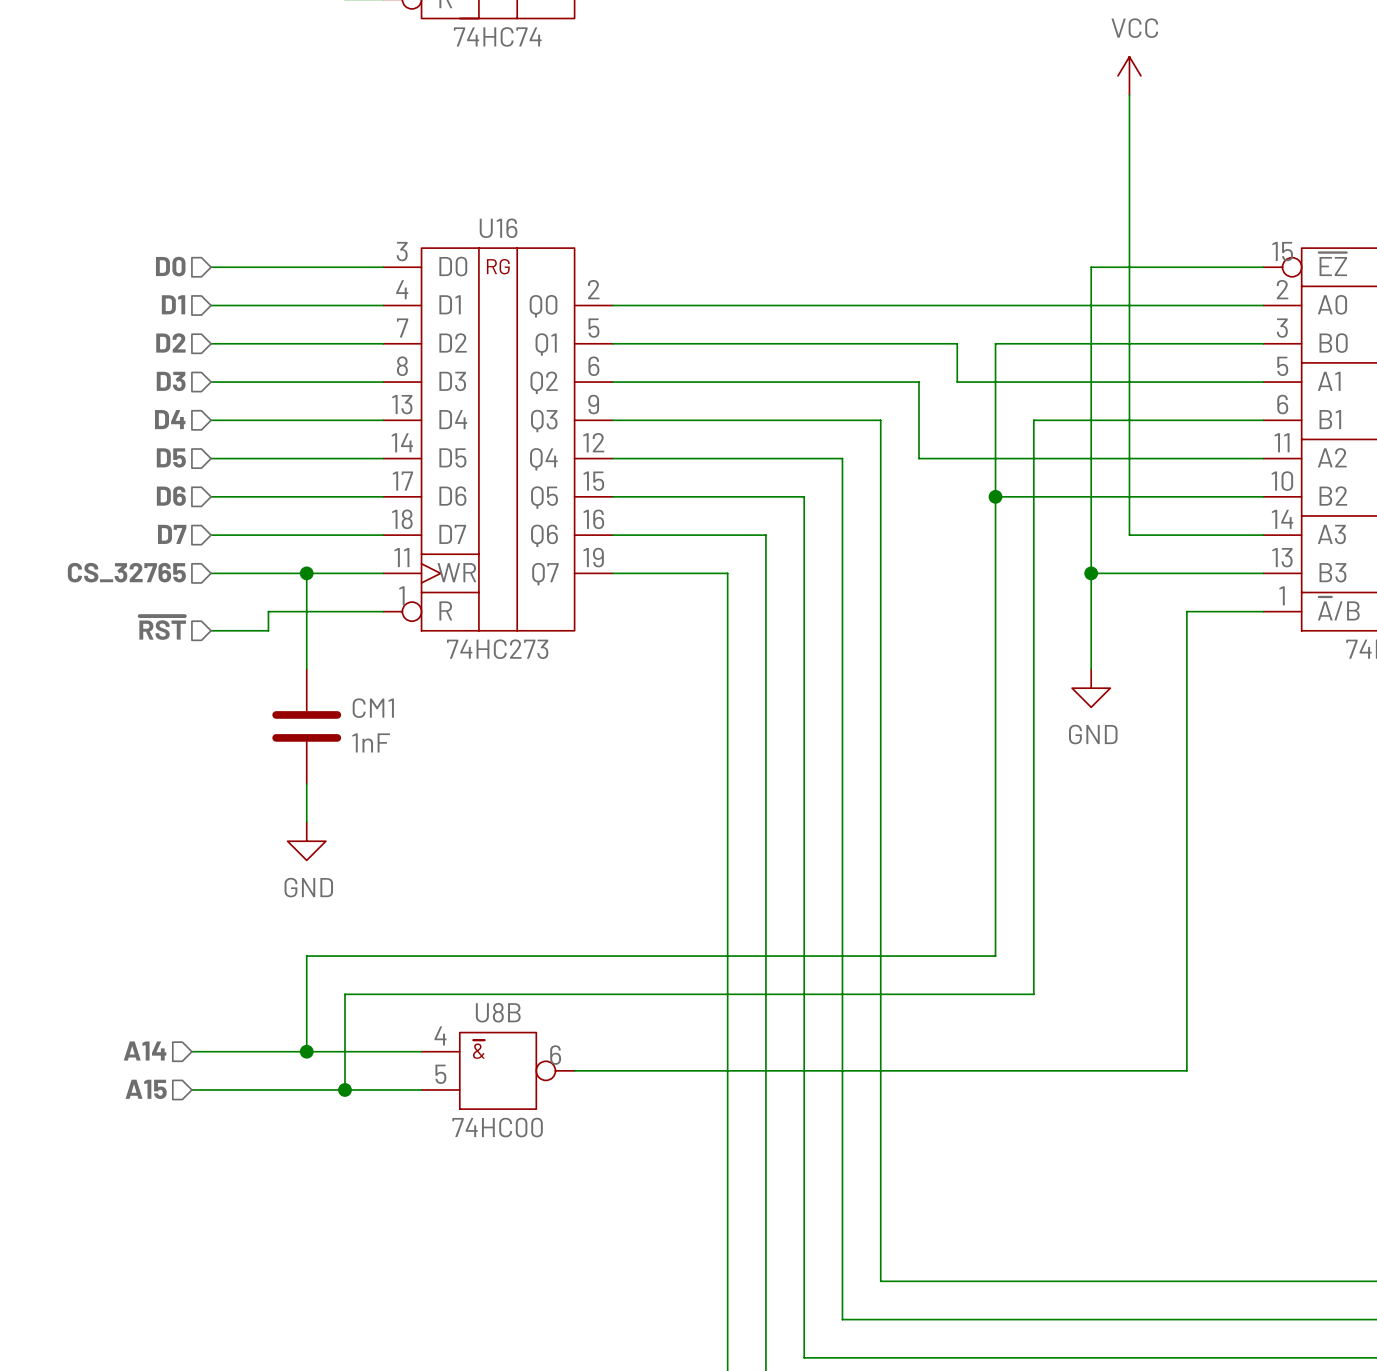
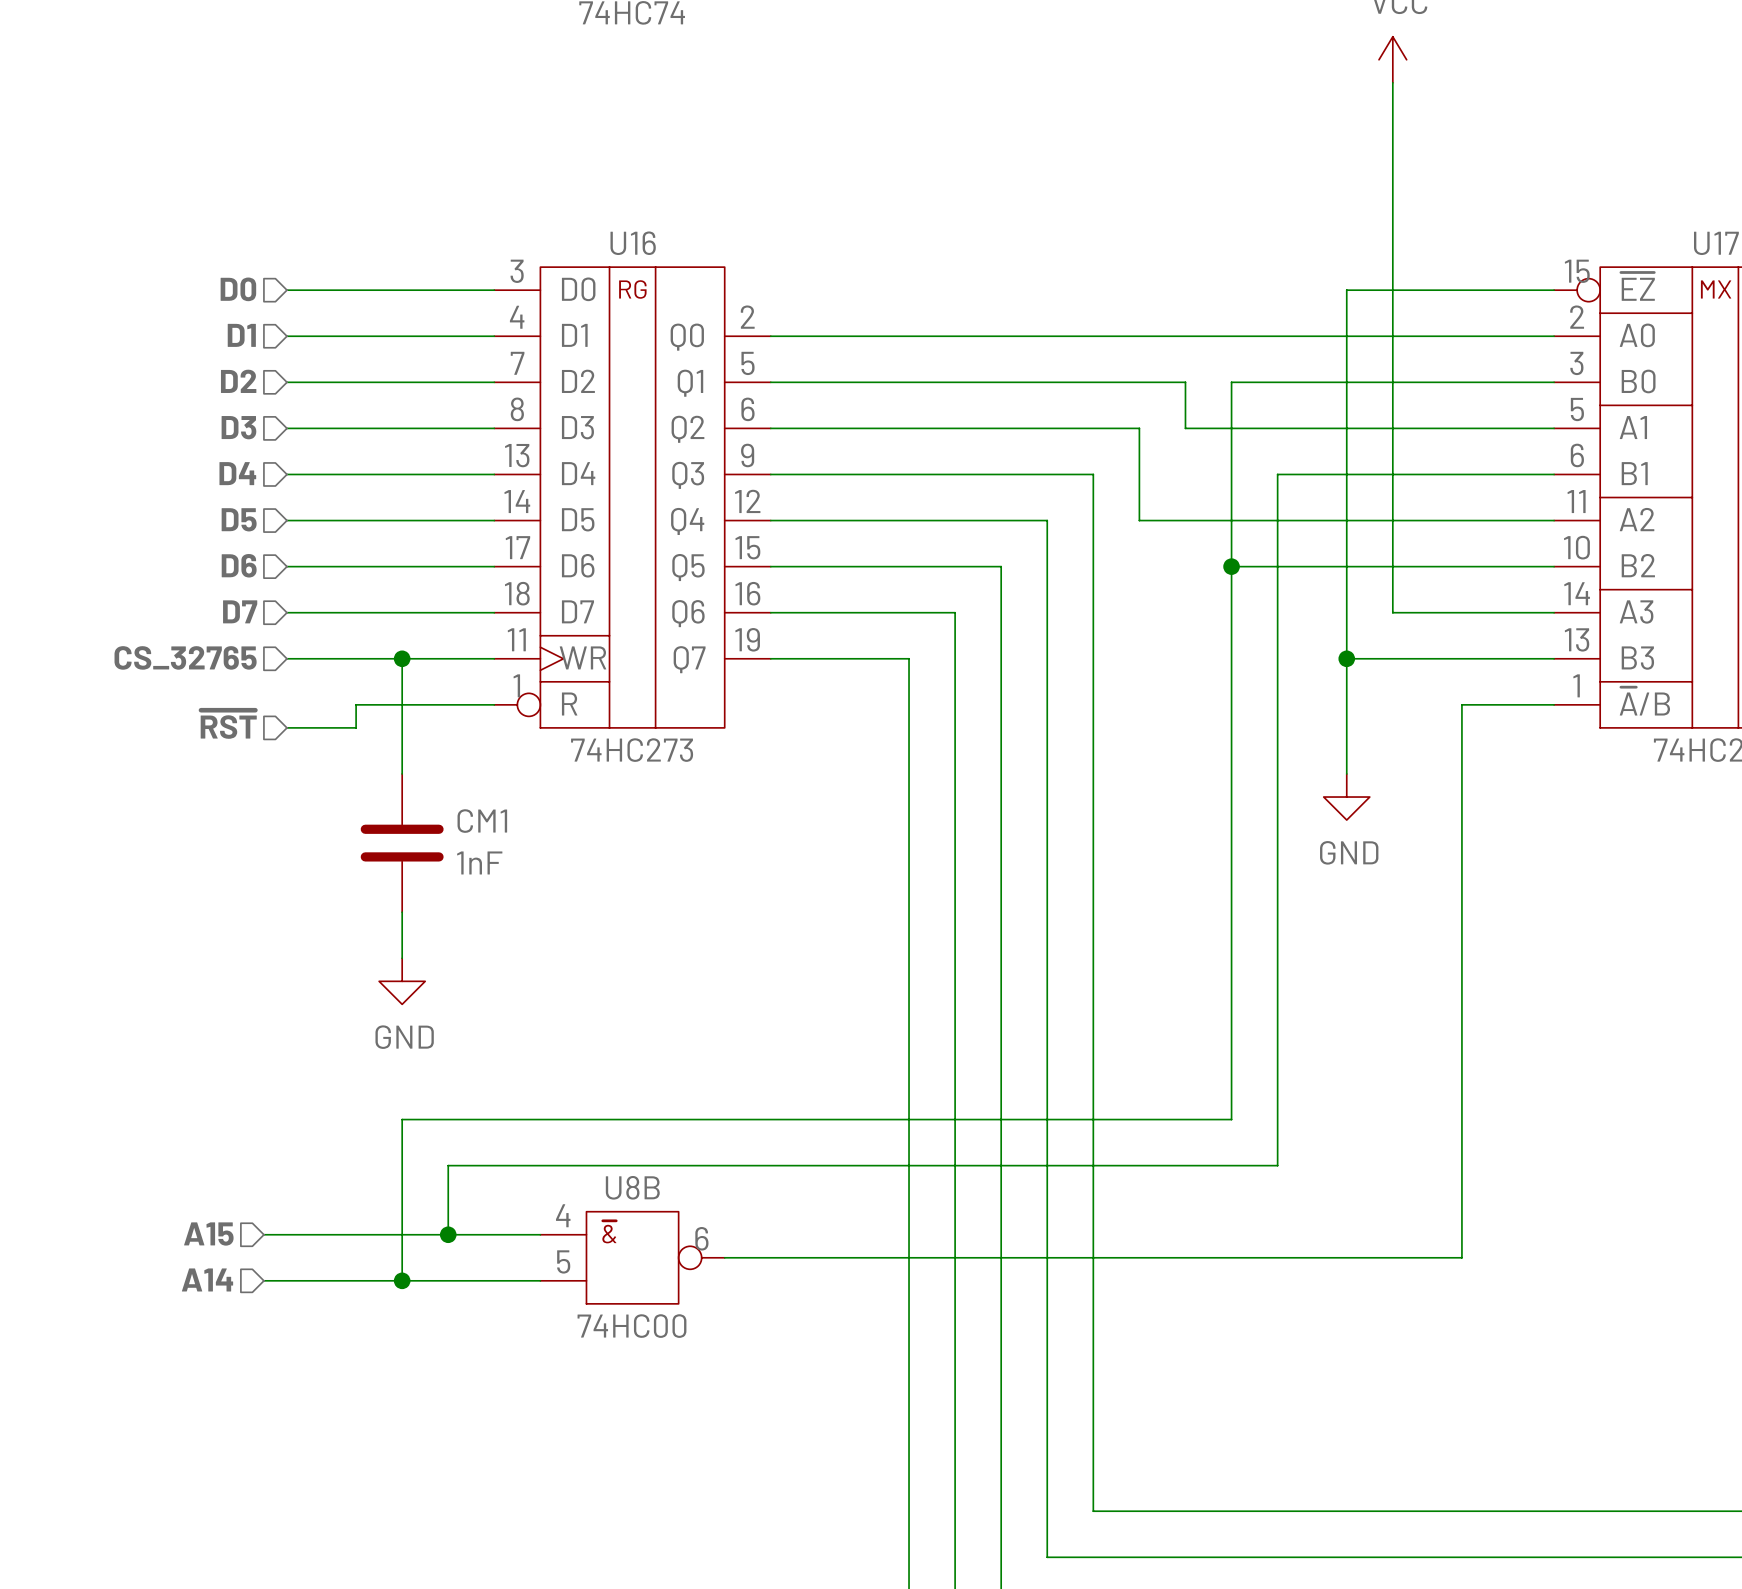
hierarchical label: A14 (145, 1051) -> A15 (208, 1234)
junction: (306, 1051) -> none
wire: (344, 1051) (344, 1089) -> (402, 1234) (402, 1280)
junction: none -> (448, 1234)
hierarchical label: A15 (146, 1089) -> A14 (207, 1279)
junction: none -> (402, 1280)
junction: (344, 1089) -> none

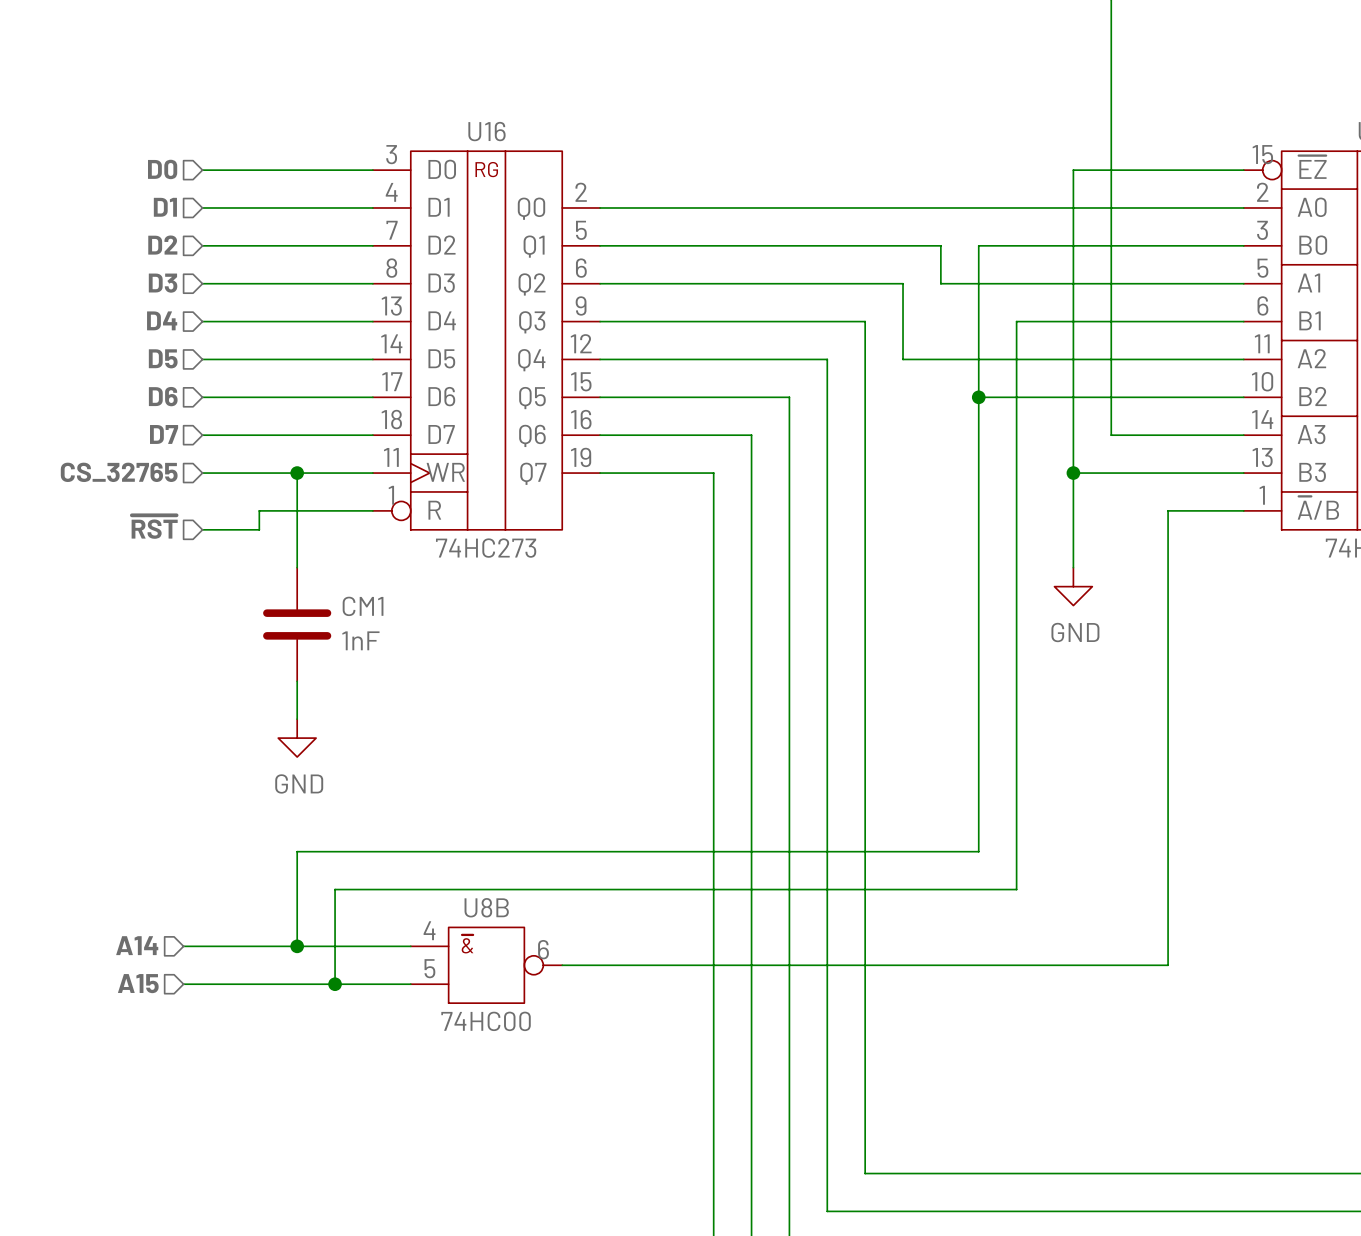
hierarchical label: A15 (208, 1234) -> A14 (137, 945)
wire: (402, 1234) (402, 1280) -> (335, 946) (335, 984)
junction: none -> (297, 946)
junction: (448, 1234) -> none
hierarchical label: A14 (207, 1279) -> A15 (138, 983)
junction: (402, 1280) -> none
junction: none -> (335, 984)

